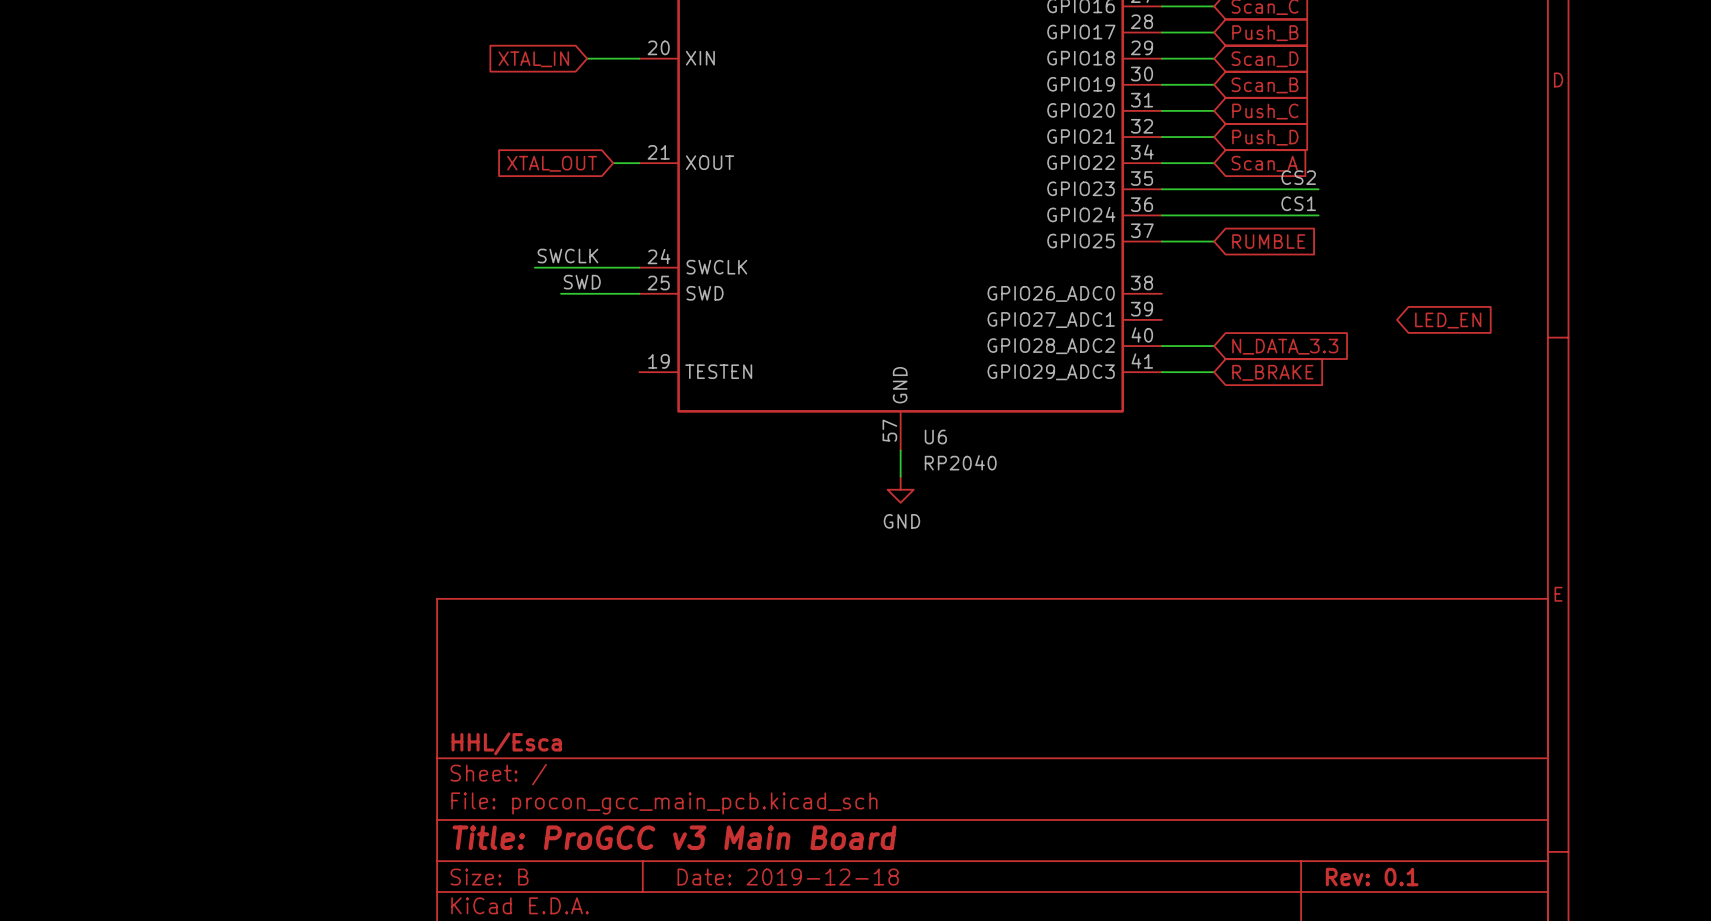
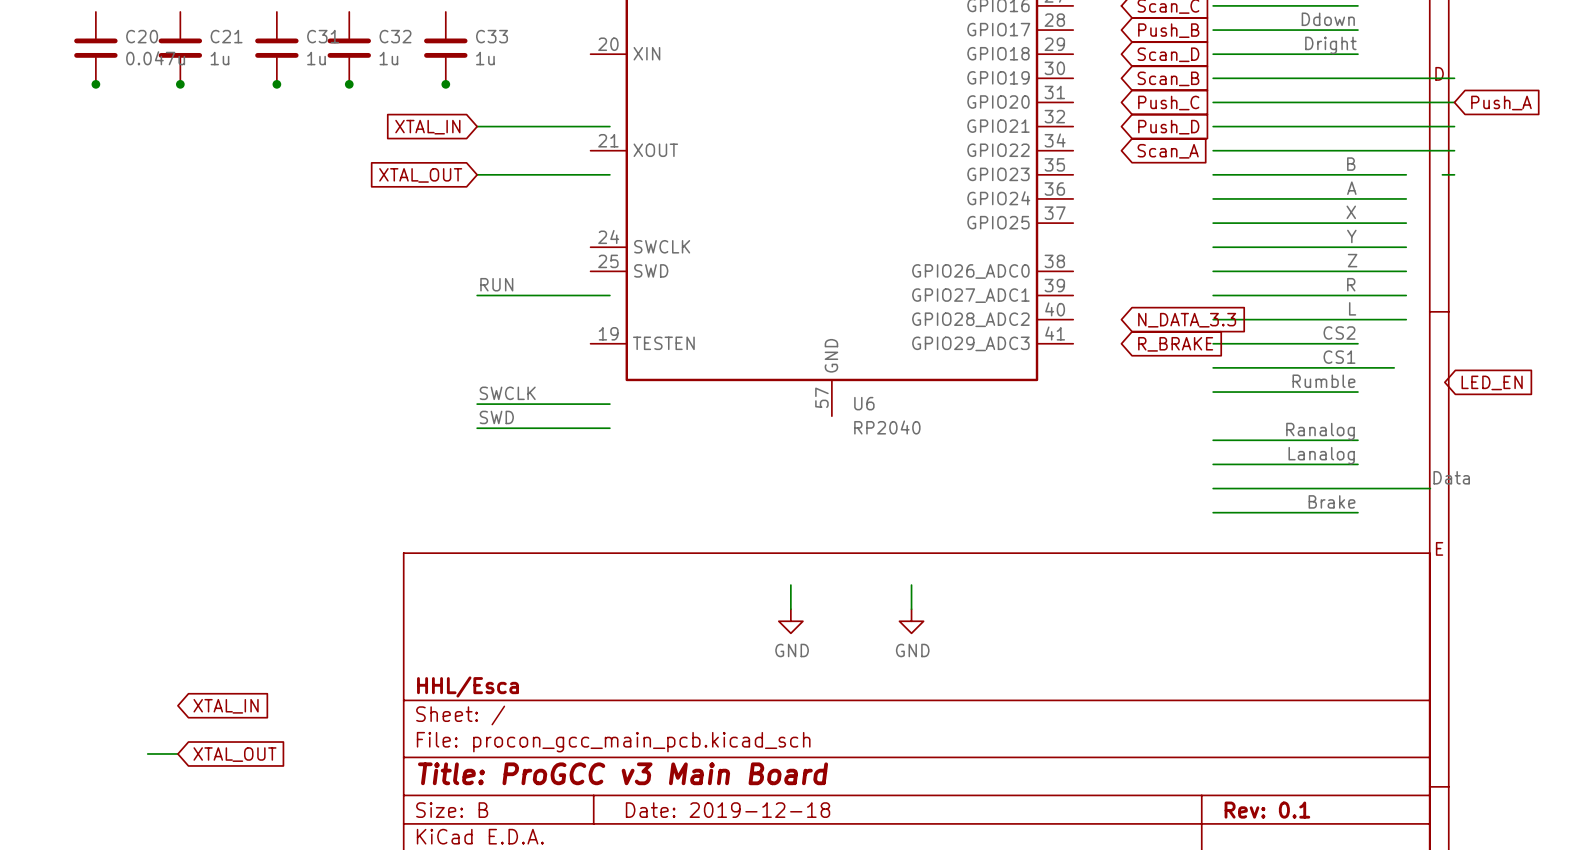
wire: (1161, 6) (1214, 6) -> none
wire: none -> (1213, 5) (1357, 5)
label: none -> Ddown (1328, 19)
wire: (1161, 32) (1214, 32) -> none
wire: none -> (1213, 30) (1357, 30)
label: none -> Dright (1330, 45)
C20: none -> 0.047u (95, 48)
C21: none -> 1u (180, 48)
C31: none -> 1u (276, 48)
C32: none -> 1u (349, 48)
C33: none -> 1u (445, 48)
wire: (587, 58) (639, 58) -> none
wire: (1161, 58) (1214, 58) -> none
wire: none -> (1213, 54) (1357, 54)
global label position: XTAL_IN (533, 59) -> XTAL_IN (427, 127)
wire: (1161, 84) (1214, 84) -> none
wire: none -> (1213, 78) (1454, 78)
junction: none -> (95, 84)
junction: none -> (180, 84)
junction: none -> (276, 84)
junction: none -> (349, 84)
junction: none -> (445, 84)
wire: (1161, 110) (1214, 110) -> none
wire: none -> (1213, 102) (1454, 102)
global label: none -> Push_A (1501, 103)
wire: none -> (477, 126) (609, 126)
wire: (1161, 137) (1214, 137) -> none
wire: none -> (1213, 126) (1454, 126)
global label position: XTAL_OUT (552, 163) -> XTAL_OUT (420, 175)
wire: (613, 163) (639, 163) -> none
wire: (1161, 163) (1214, 163) -> none
wire: none -> (1213, 150) (1454, 150)
label position: CS2 (1298, 177) -> CS2 (1339, 332)
label: none -> B (1351, 164)
wire: none -> (477, 174) (609, 174)
wire: (1161, 189) (1313, 189) -> none
wire: none -> (1218, 174) (1406, 174)
wire: none -> (1442, 174) (1454, 174)
label position: CS1 (1298, 203) -> CS1 (1339, 357)
label: none -> A (1351, 188)
wire: (1161, 215) (1313, 215) -> none
wire: none -> (1218, 198) (1406, 198)
label: none -> X (1351, 212)
wire: (1161, 241) (1214, 241) -> none
global label: RUMBLE (1268, 241) -> none
wire: none -> (1213, 223) (1406, 223)
label position: SWCLK (567, 256) -> SWCLK (507, 393)
label: none -> Y (1351, 236)
wire: (534, 267) (639, 267) -> none
wire: none -> (1213, 247) (1406, 247)
label position: SWD (582, 282) -> SWD (496, 417)
label: none -> Z (1352, 260)
wire: (561, 293) (639, 293) -> none
wire: none -> (1213, 271) (1406, 271)
label: none -> RUN (496, 284)
label: none -> R (1351, 284)
wire: none -> (477, 295) (609, 295)
wire: none -> (1213, 295) (1406, 295)
global label position: LED_EN (1448, 320) -> LED_EN (1492, 382)
label: none -> L (1352, 308)
wire: (1161, 346) (1214, 346) -> none
wire: none -> (1213, 319) (1406, 319)
wire: (1161, 372) (1214, 372) -> none
wire: none -> (1213, 343) (1357, 343)
wire: none -> (1213, 367) (1394, 367)
label: none -> Rumble (1323, 381)
wire: none -> (1213, 392) (1357, 392)
wire: none -> (477, 404) (609, 404)
wire: (900, 450) (900, 476) -> (790, 585) (790, 609)
wire: none -> (477, 428) (609, 428)
label: none -> Ranalog (1320, 431)
wire: none -> (1213, 440) (1357, 440)
power symbol: GND (900, 489) -> none
label: none -> Lanalog (1321, 455)
wire: none -> (1213, 464) (1357, 464)
label: none -> Data (1451, 477)
wire: none -> (1213, 488) (1430, 488)
label: none -> Brake (1332, 501)
wire: none -> (1213, 512) (1357, 512)
wire: none -> (911, 585) (911, 609)
power symbol: none -> GND (790, 621)
power symbol: none -> GND (911, 621)
global label: none -> XTAL_IN (226, 706)
wire: none -> (147, 753) (177, 753)
global label: none -> XTAL_OUT (234, 754)

